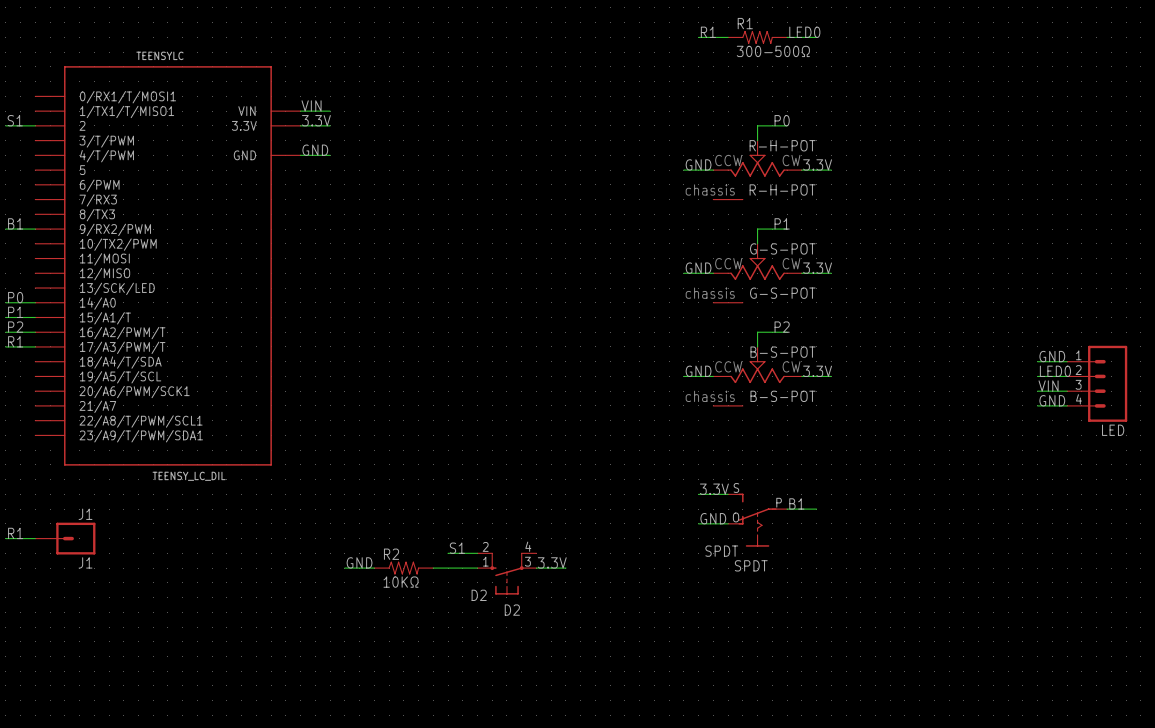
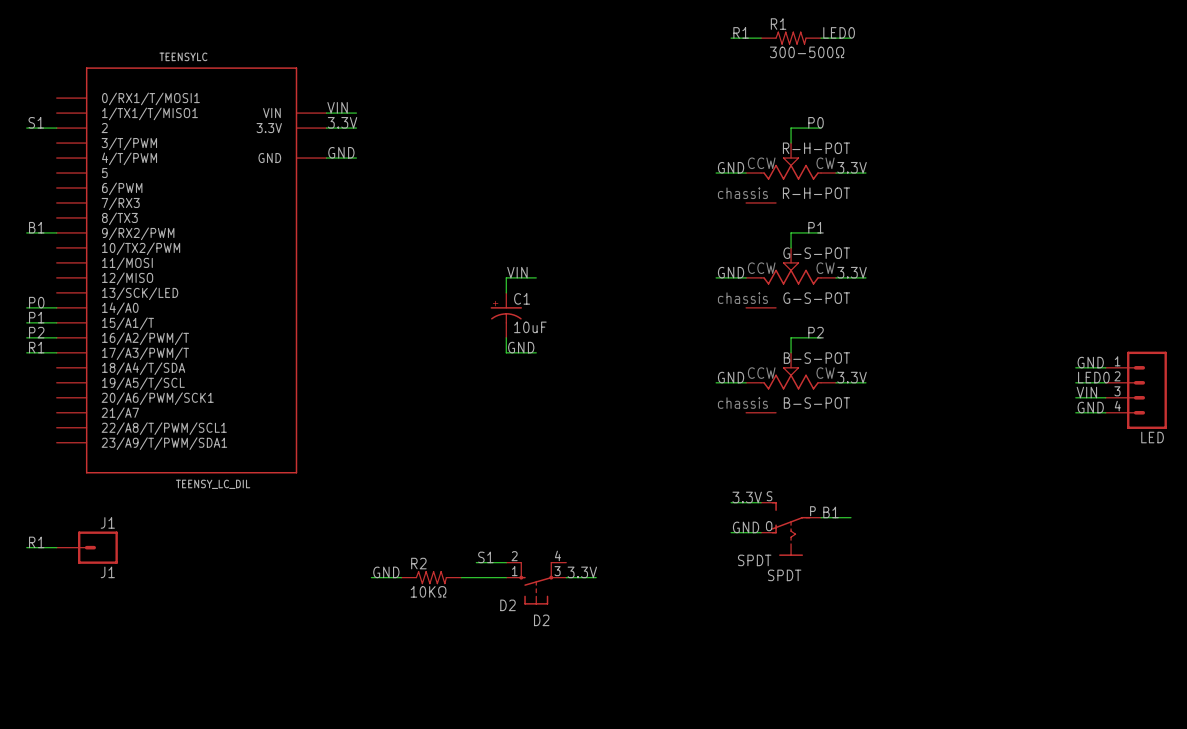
label: none -> VIN (517, 272)
wire: none -> (536, 277) (506, 277) (506, 292)
C1: none -> 10uF (506, 315)
wire: none -> (506, 337) (506, 352) (536, 352)
label: none -> GND (521, 347)

